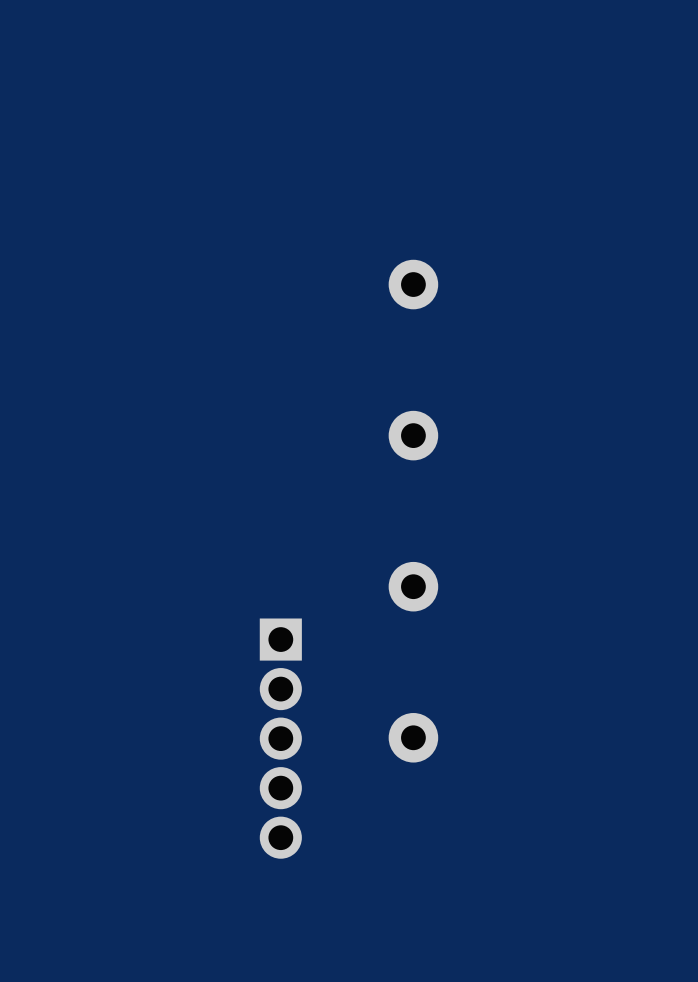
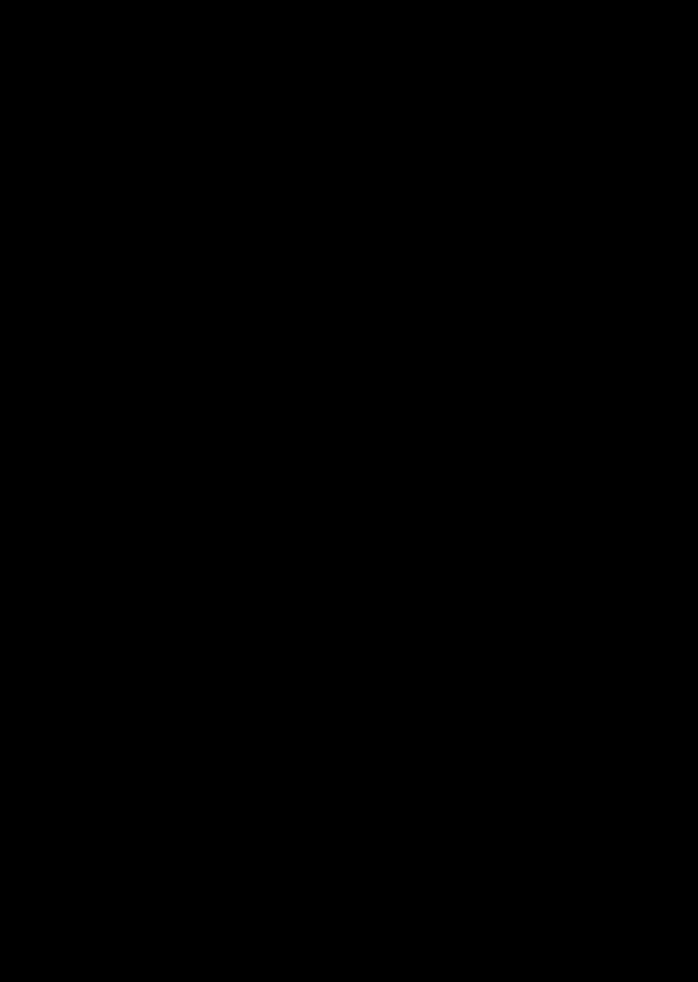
part: (413, 284) -> none
part: (413, 435) -> none
part: (413, 586) -> none
part: (413, 737) -> none
part: (280, 738) -> none

